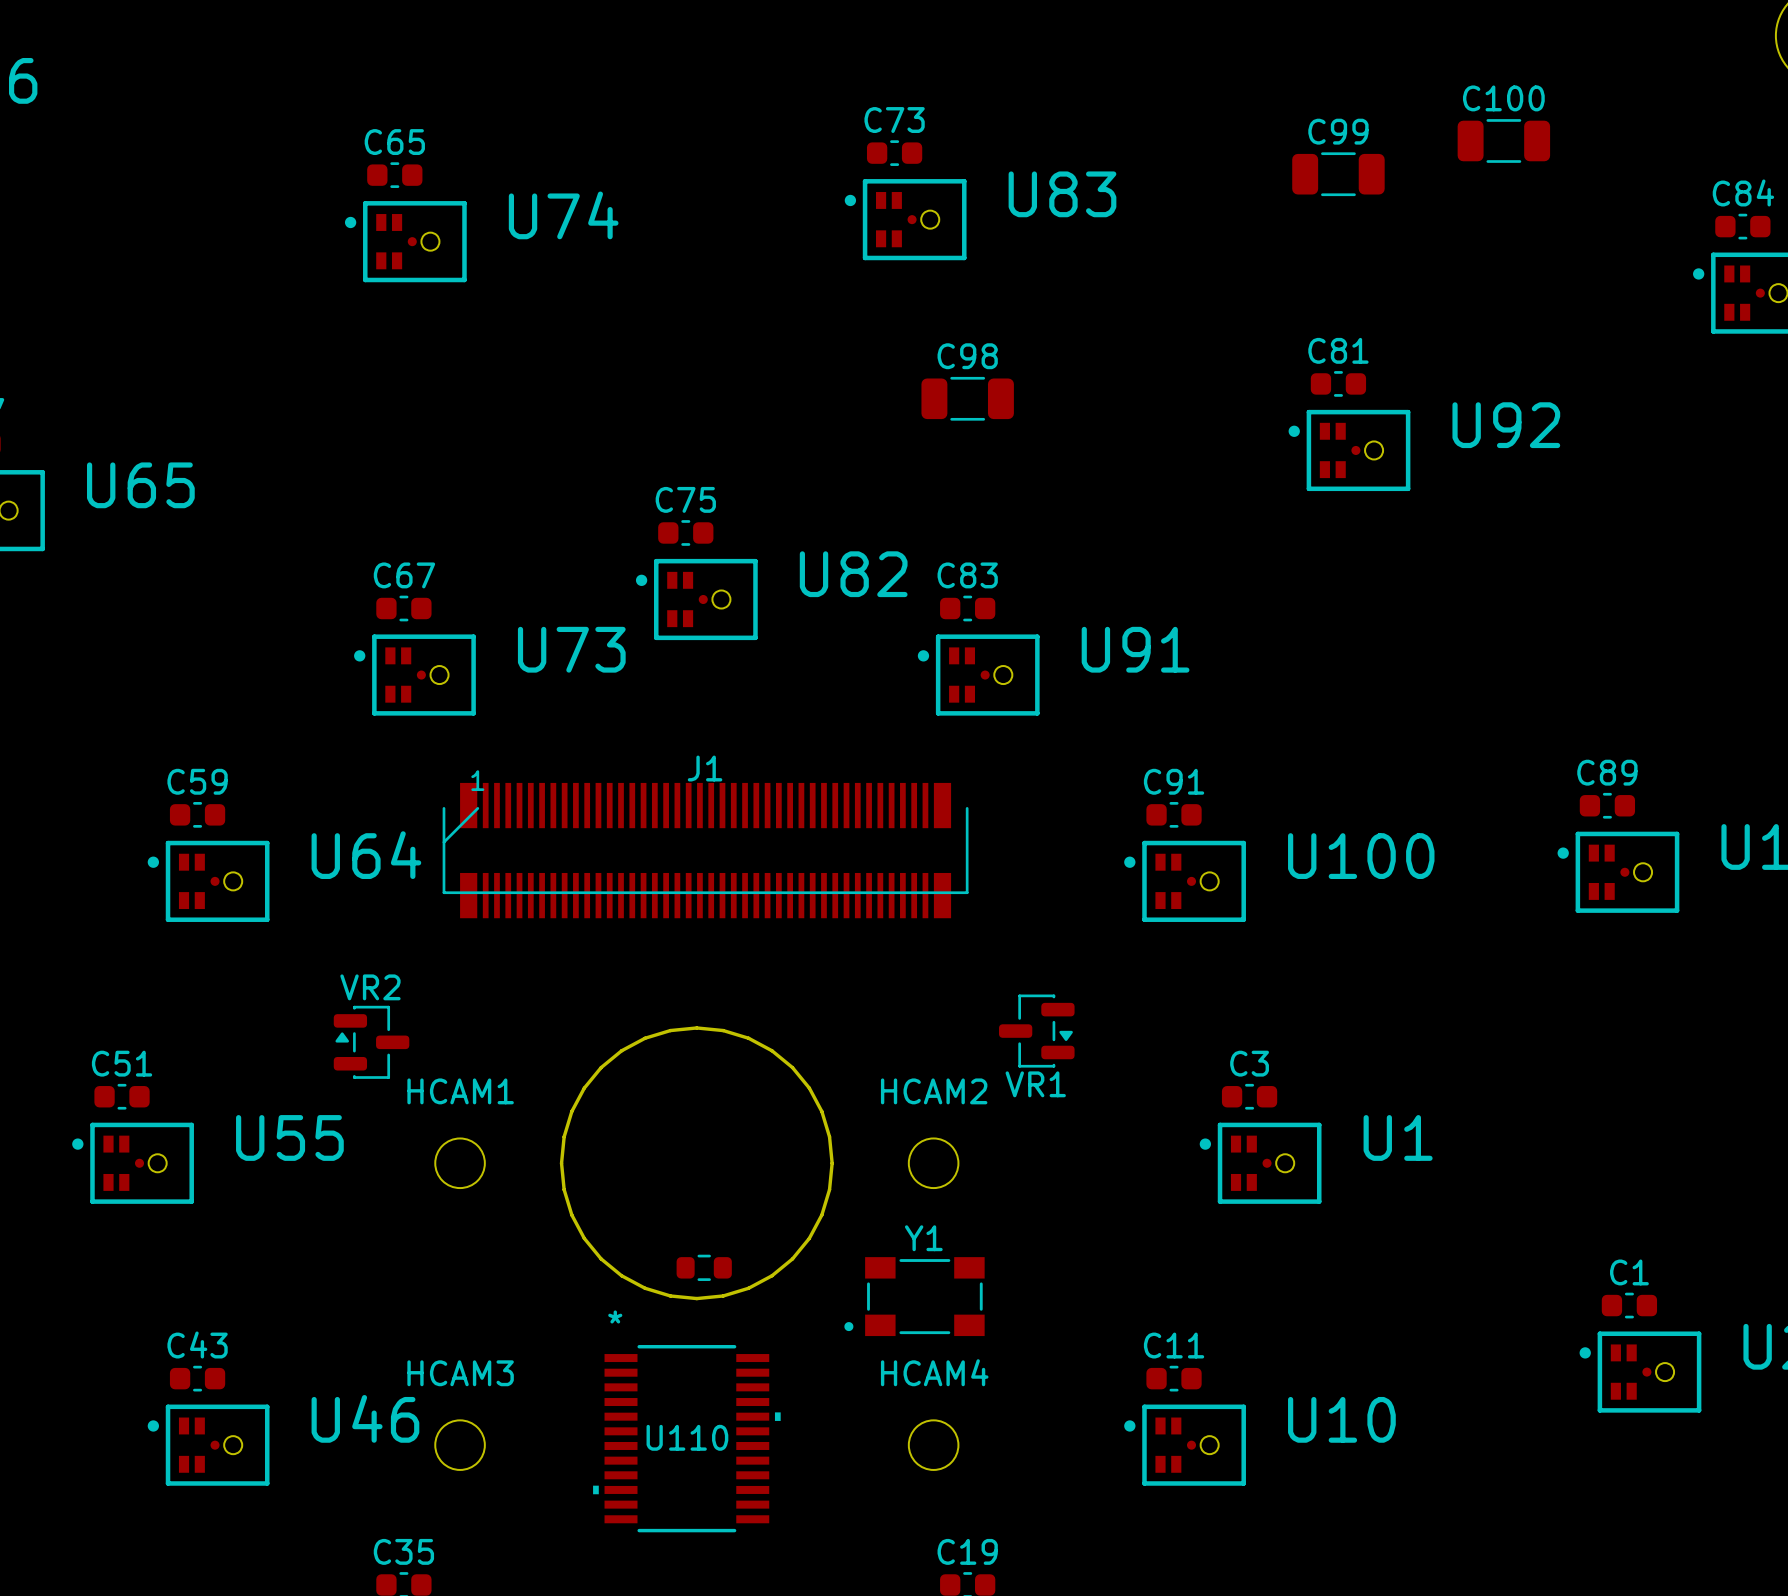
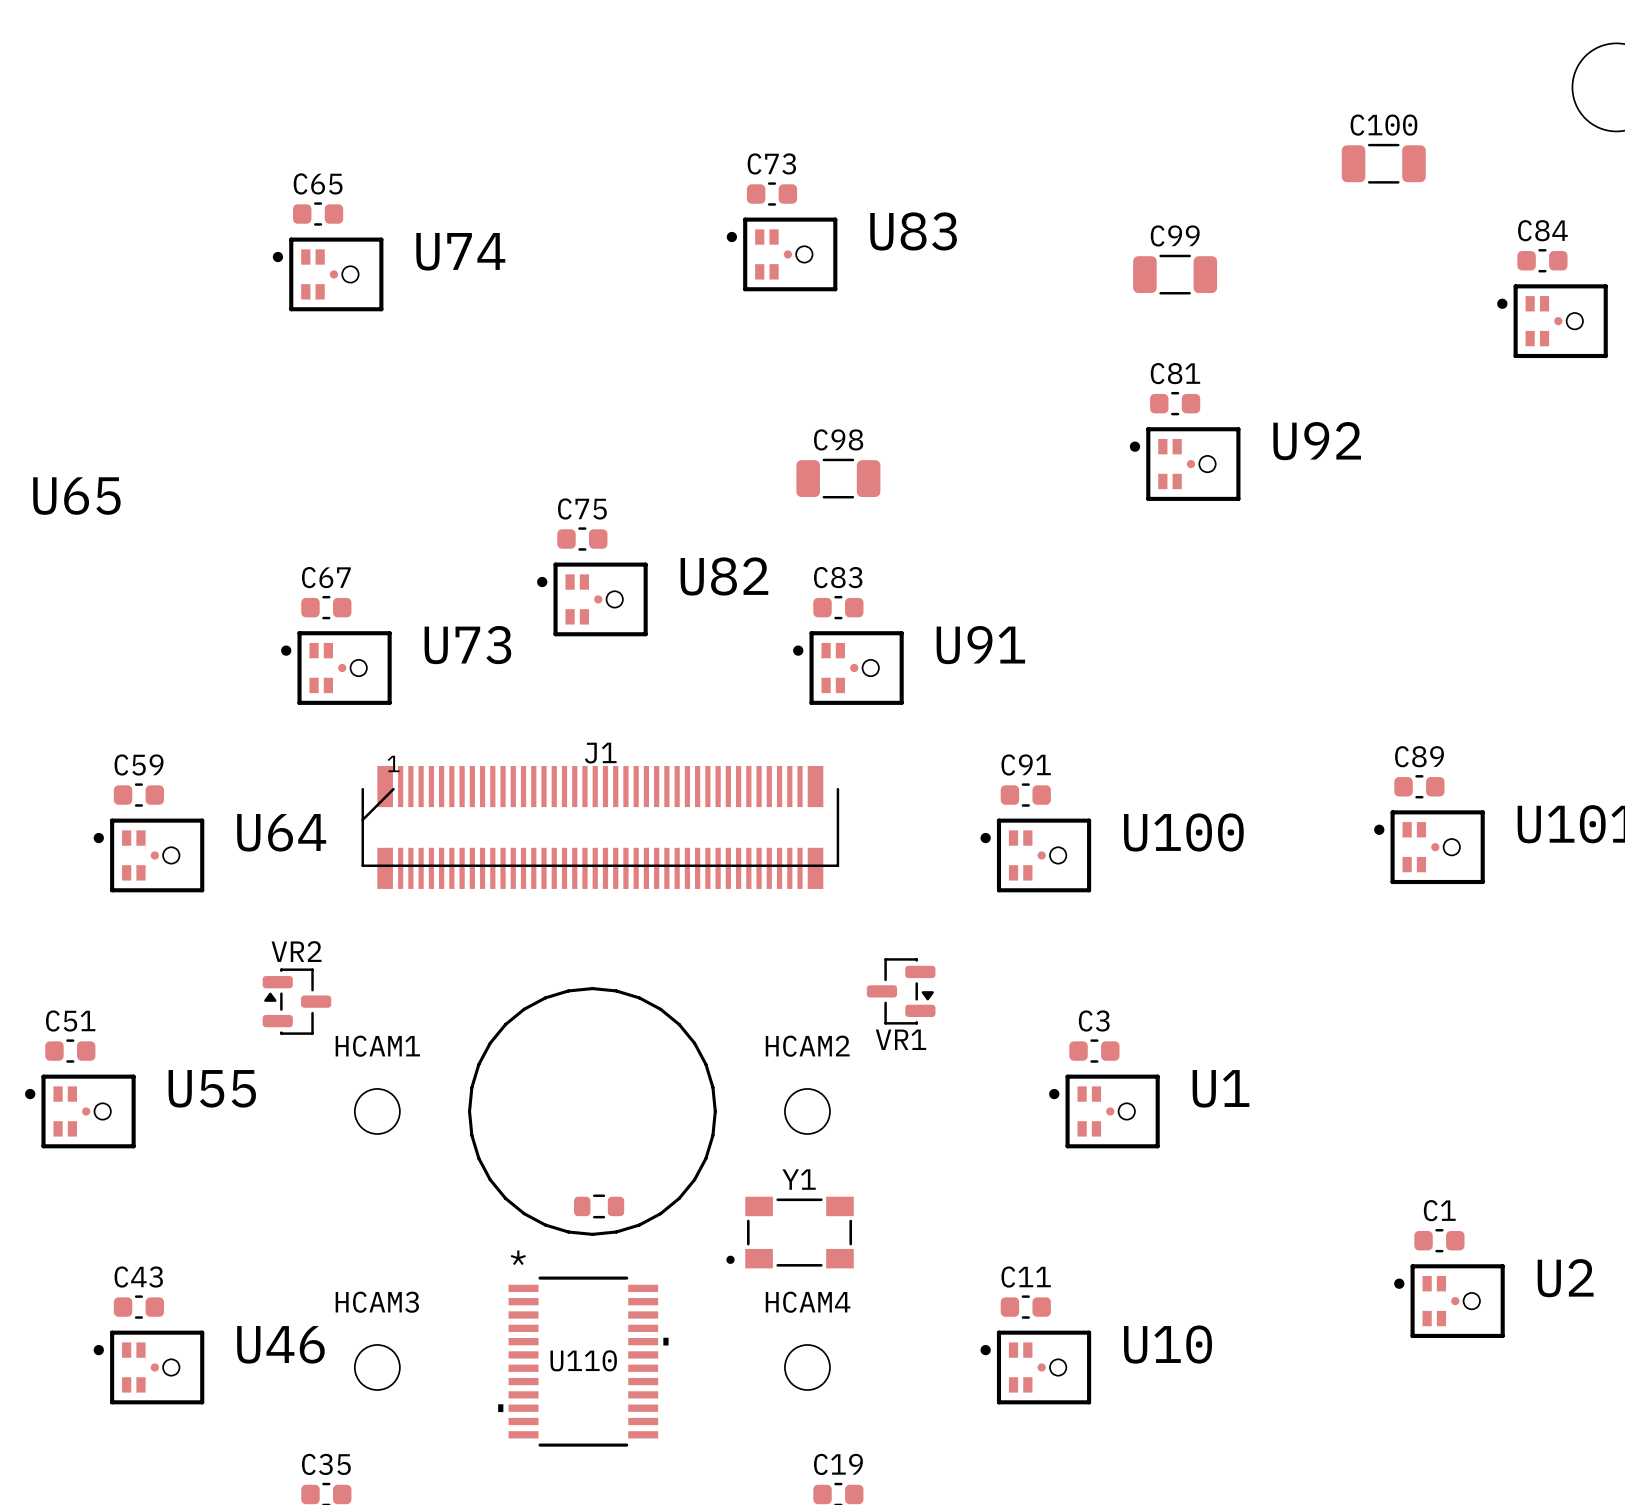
C100 position: (1503, 140) -> (1383, 163)
C99 position: (1338, 174) -> (1175, 274)
C98 position: (967, 398) -> (838, 478)

